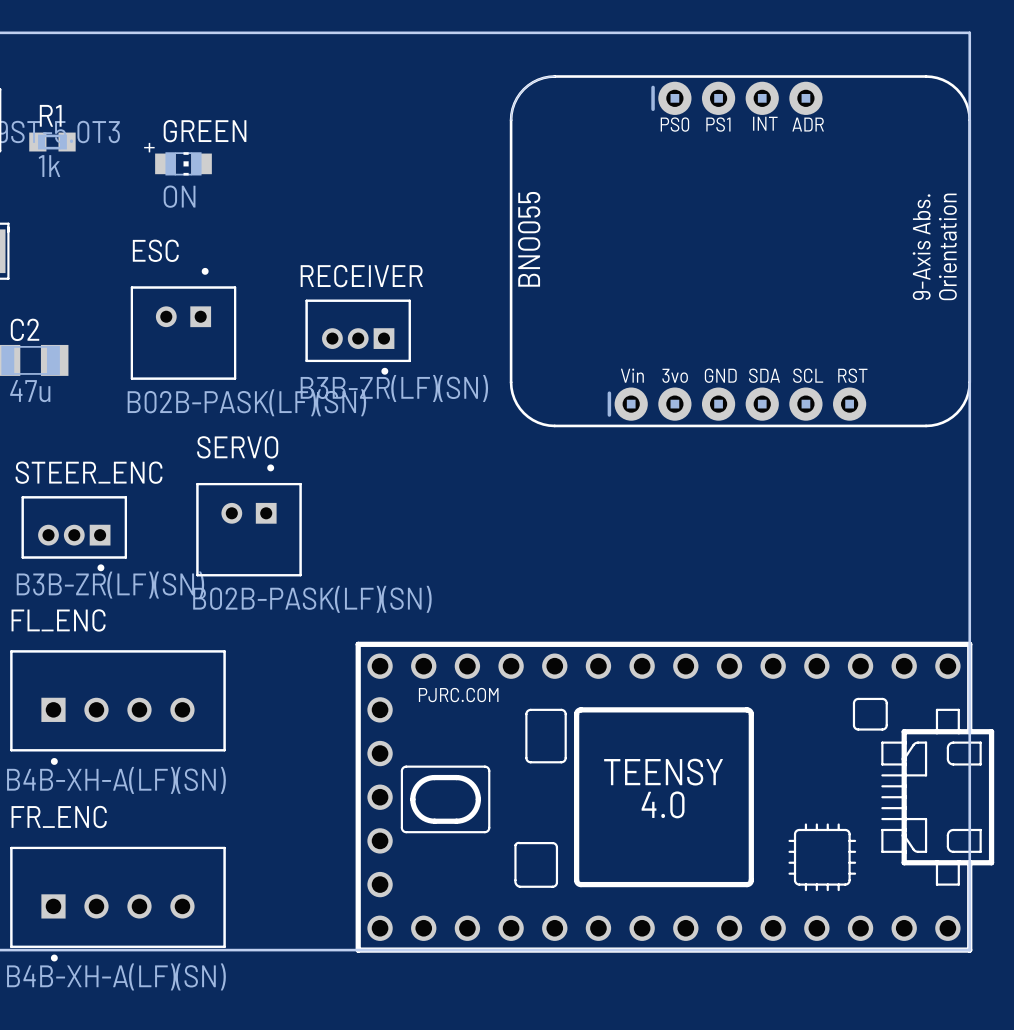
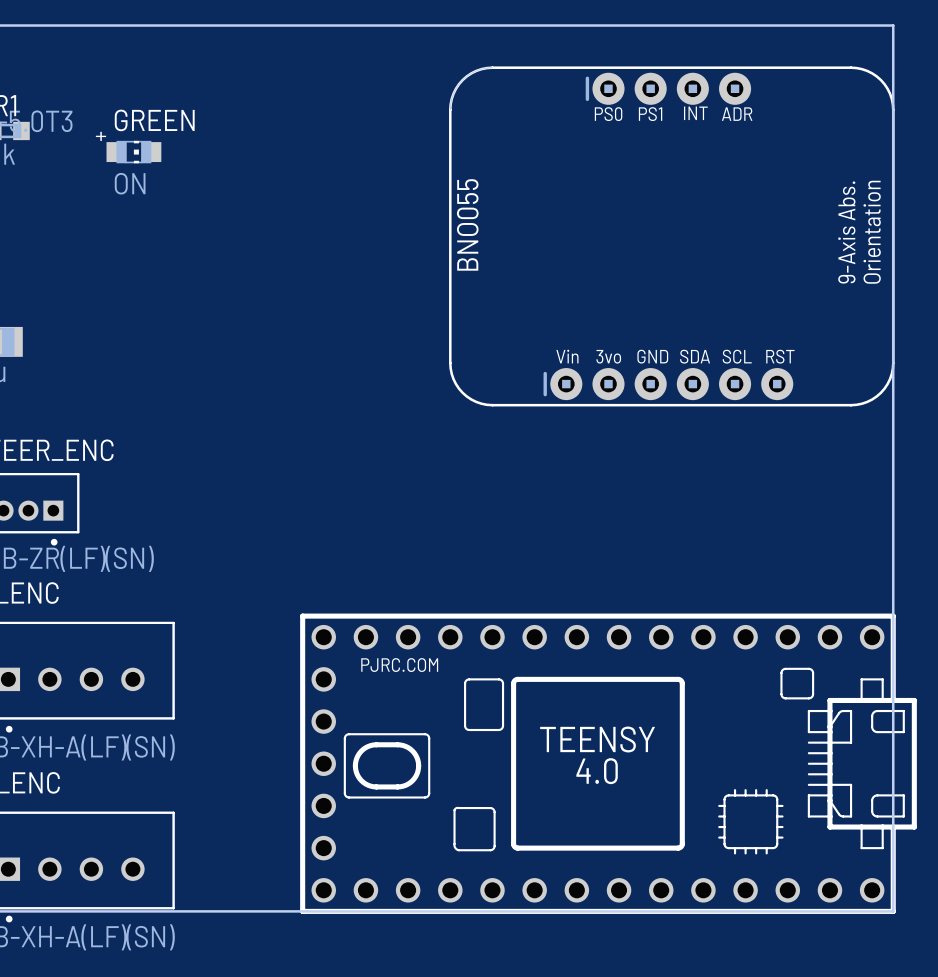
ESC: B02B-PASK(LF)(SN) (183, 323) -> none
RECEIVER: B3B-ZR(LF)(SN) (358, 337) -> none
SERVO: B02B-PASK(LF)(SN) (249, 520) -> none

